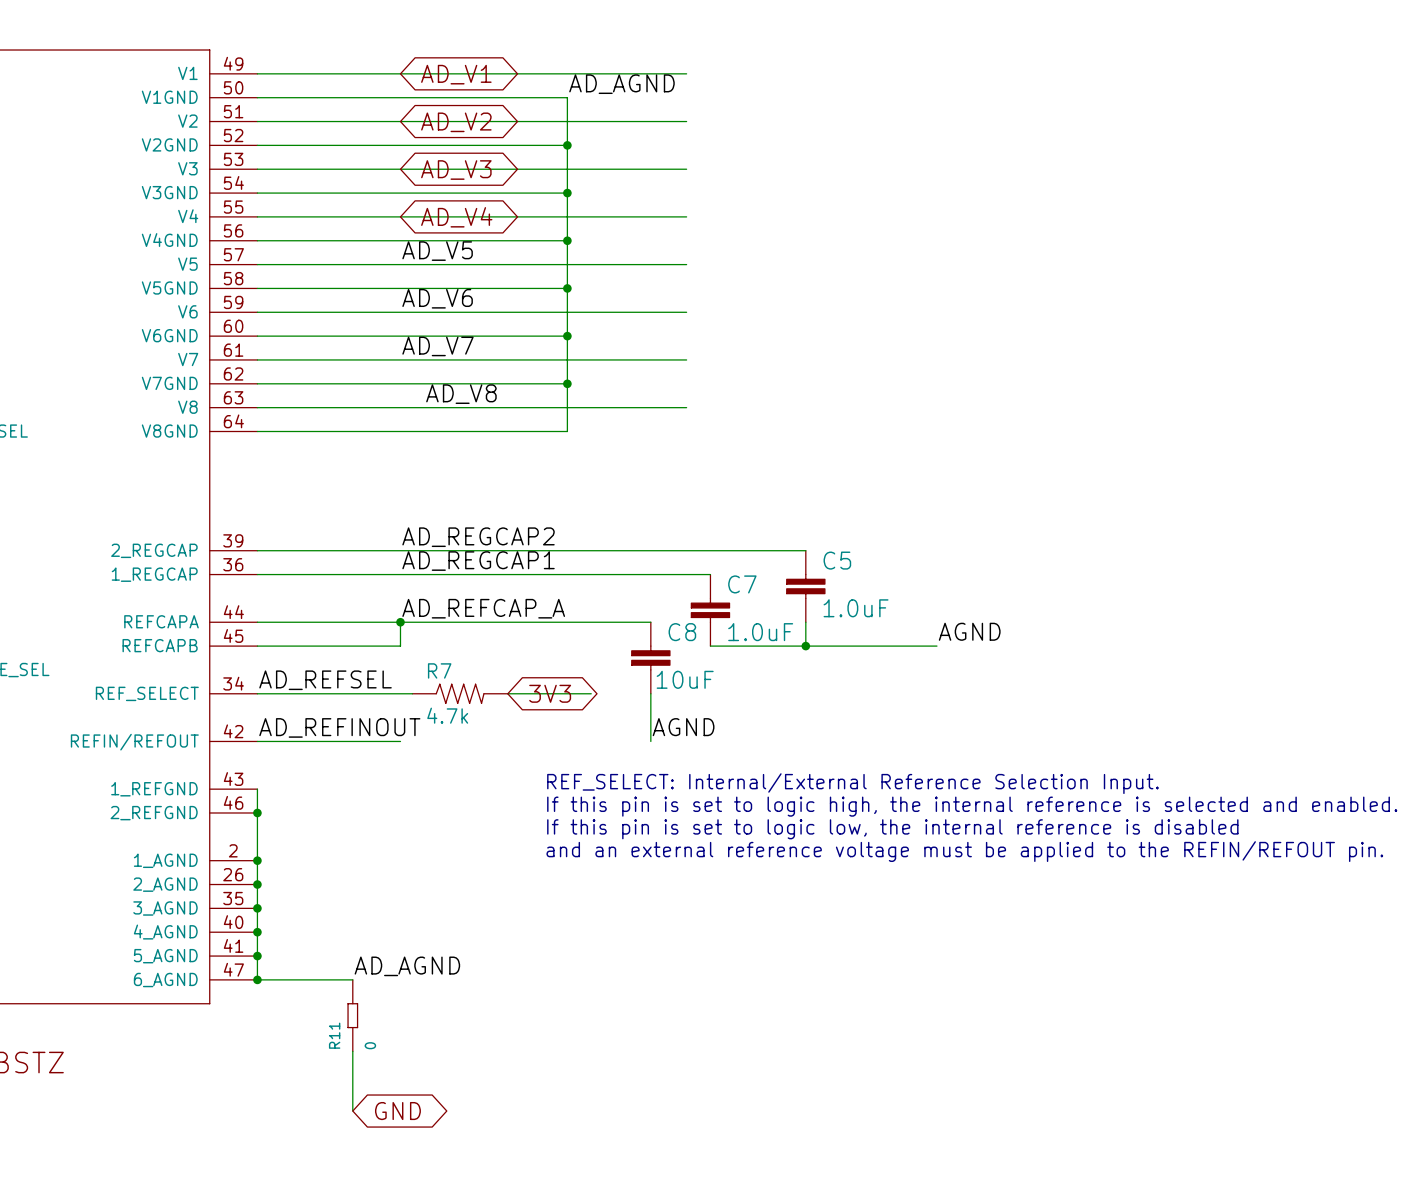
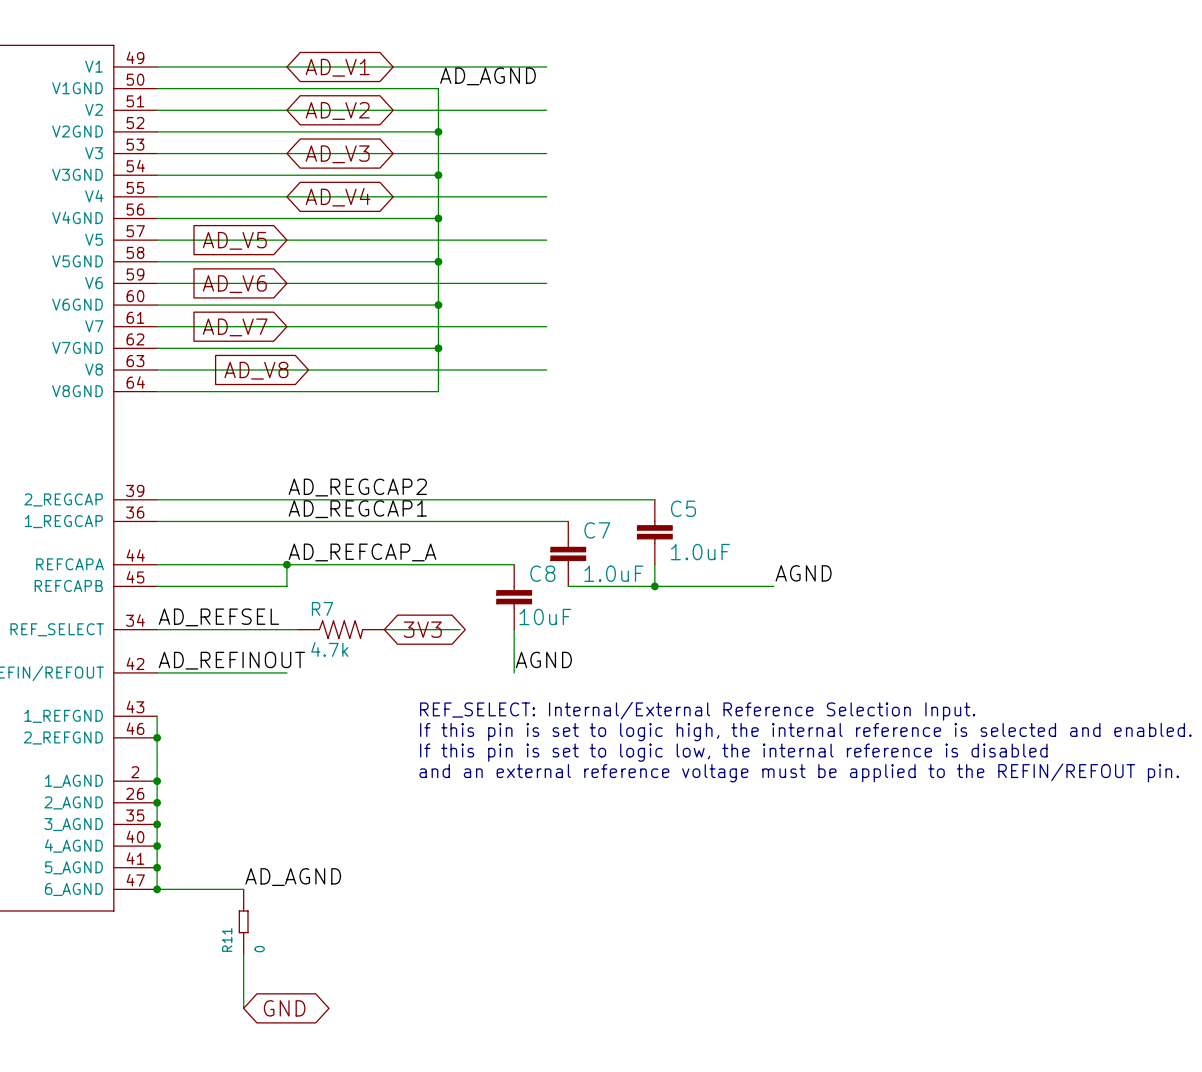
label: AD_V5 (437, 251) -> none
global label: none -> AD_V5 (234, 240)
label: AD_V6 (437, 298) -> none
global label: none -> AD_V6 (234, 284)
label: AD_V7 (437, 346) -> none
global label: none -> AD_V7 (235, 327)
label: AD_V8 (461, 394) -> none
global label: none -> AD_V8 (256, 370)

